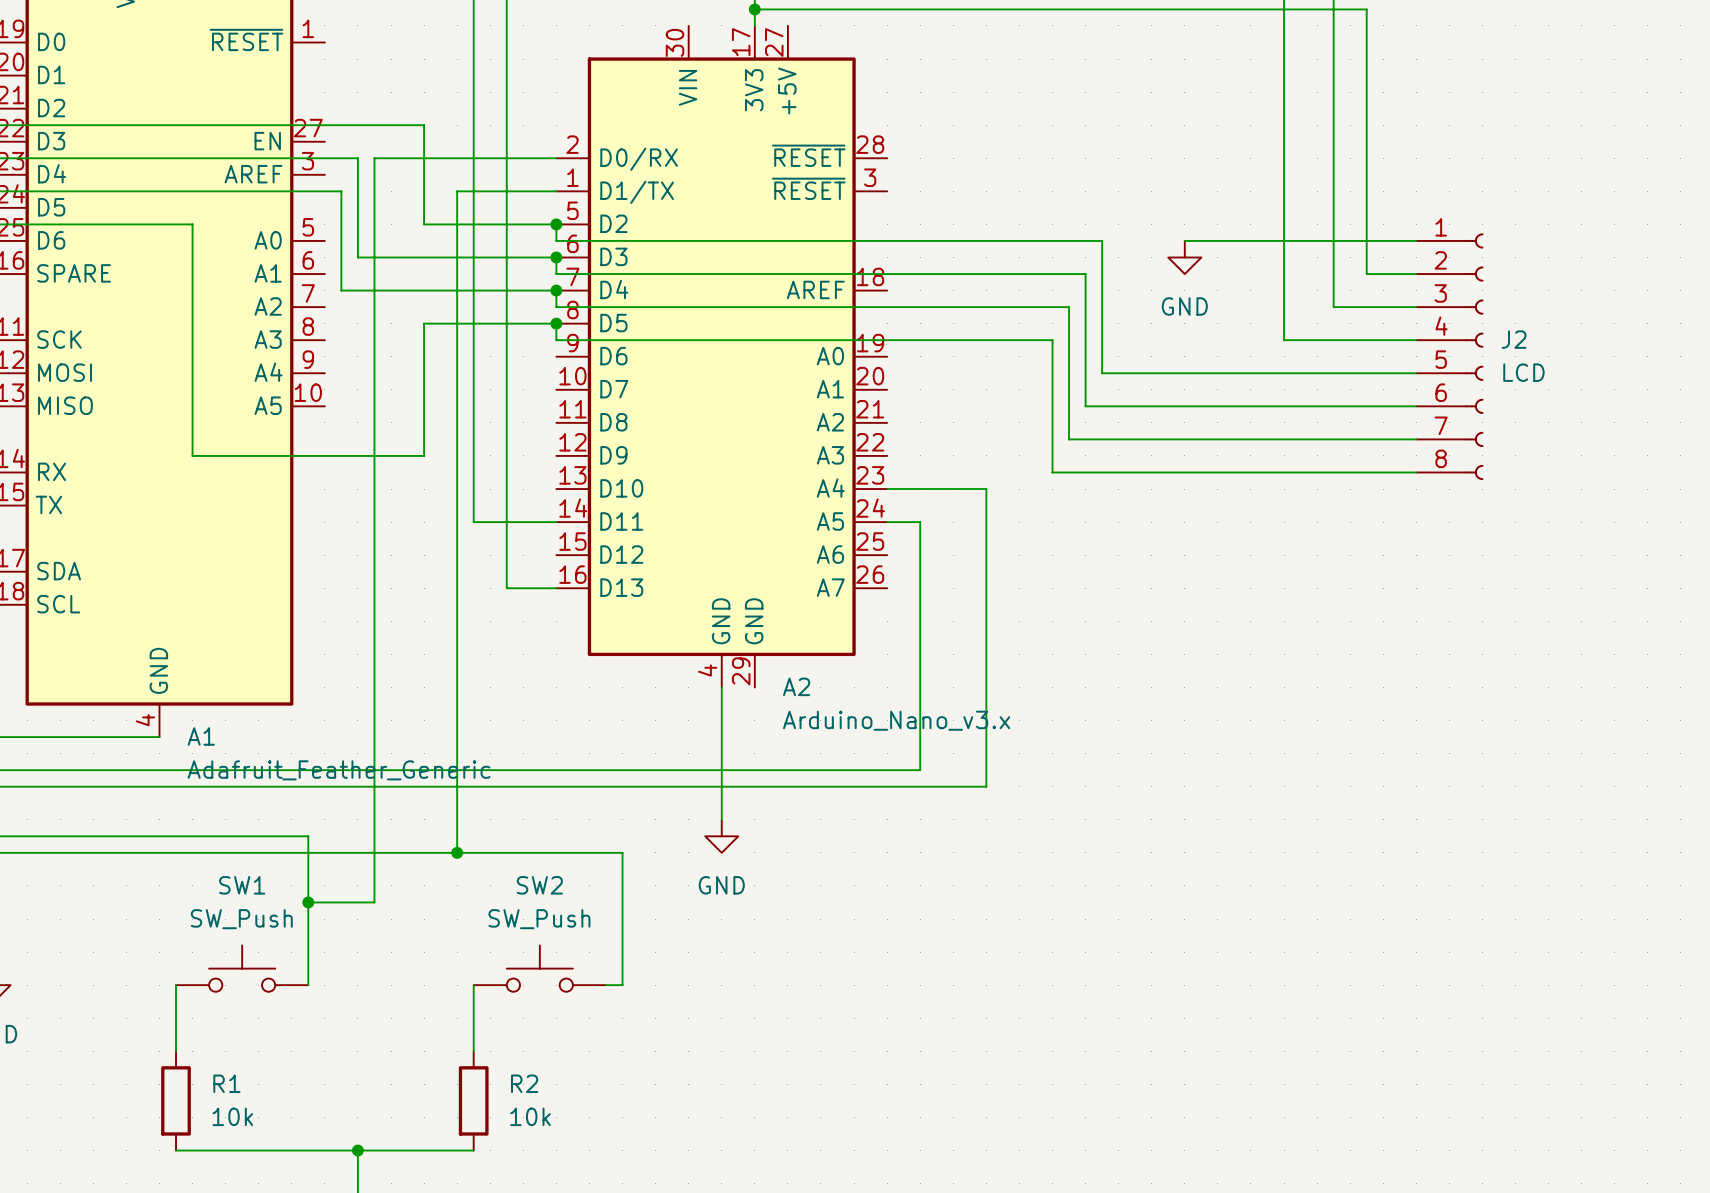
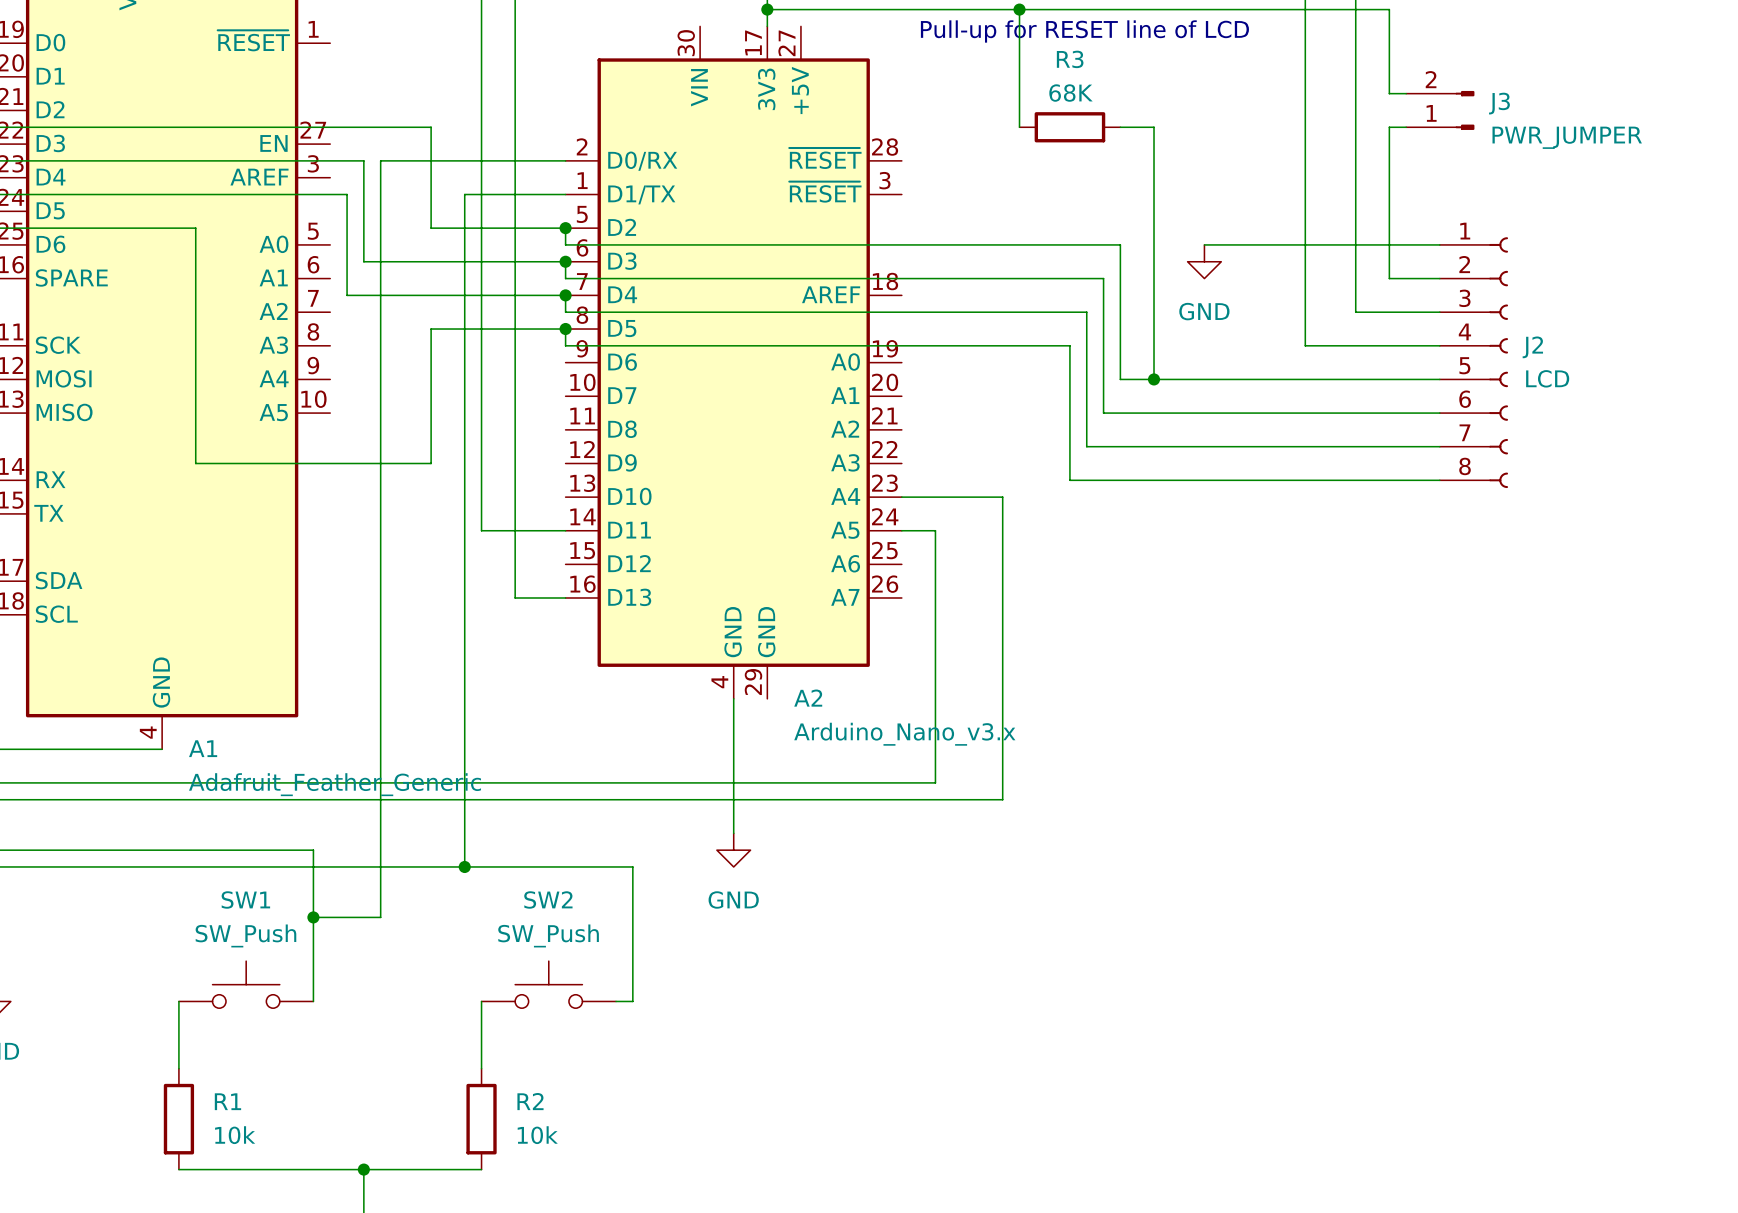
wire: none -> (1019, 9) (1019, 127)
junction: none -> (1019, 9)
text: none -> Pull-up for RESET line of LCD (1084, 31)
wire: (1366, 92) (1366, 125) -> (1389, 93) (1406, 93)
J3: none -> PWR_JUMPER (1440, 110)
R3: none -> 68K (1069, 127)
wire: none -> (1120, 127) (1154, 127) (1154, 379)
wire: none -> (1389, 127) (1406, 127)
junction: none -> (1154, 379)

